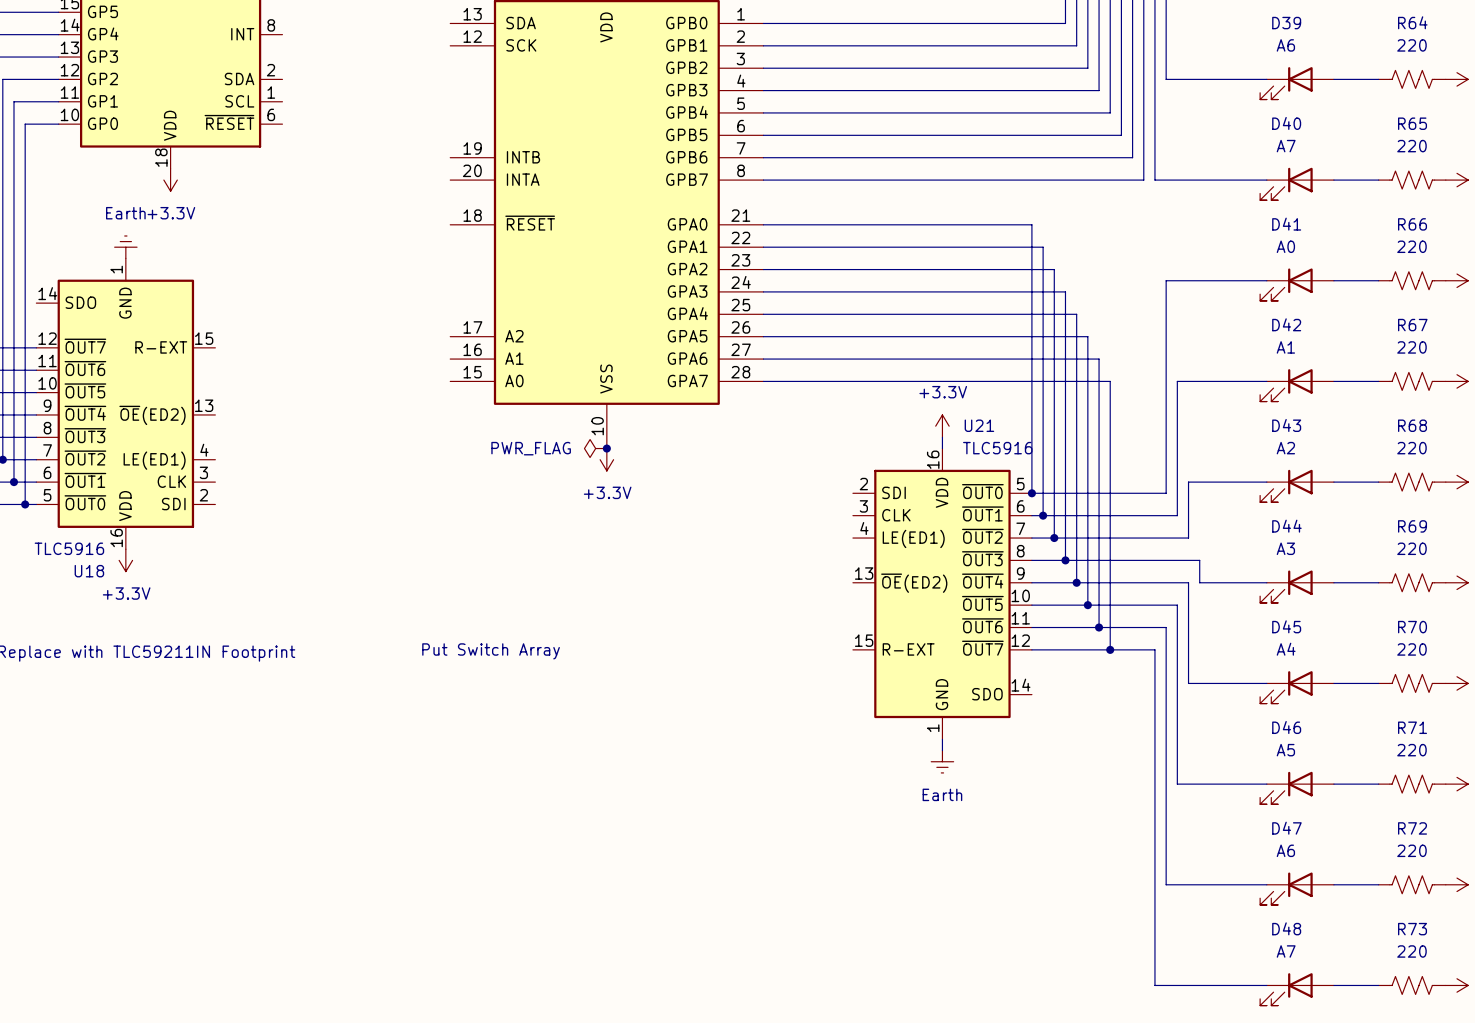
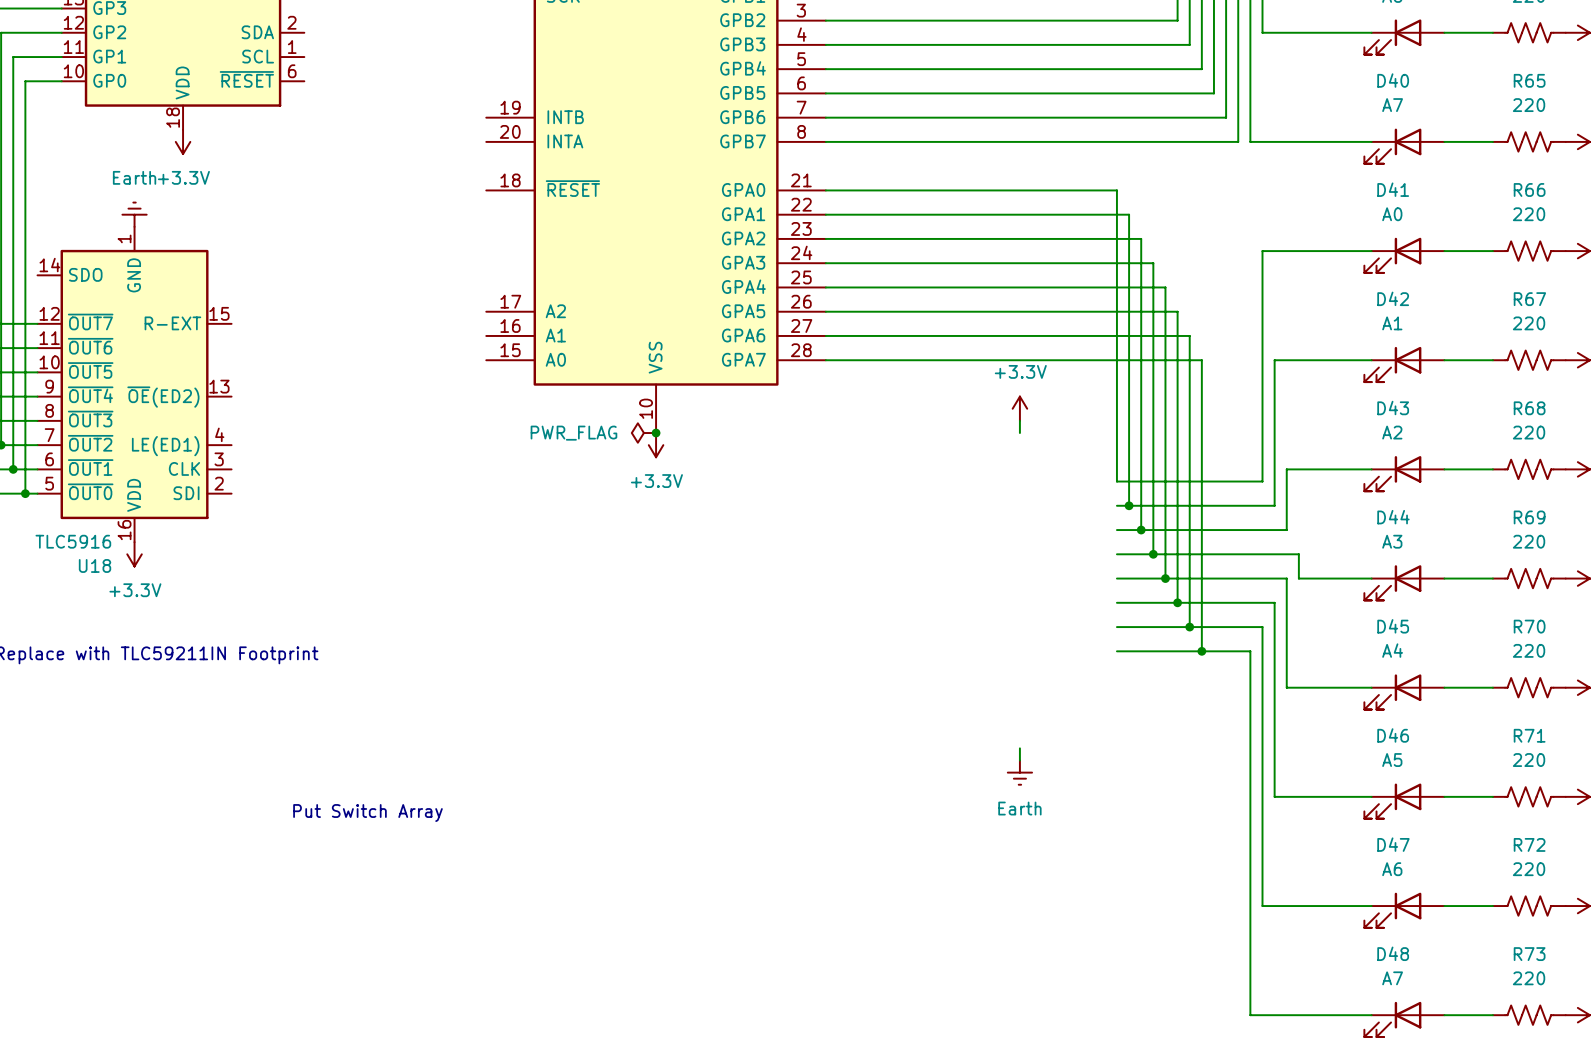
junction: (1031, 493) -> none
U21: TLC5916 (942, 593) -> none
text position: Put Switch Array (491, 651) -> Put Switch Array (367, 813)

